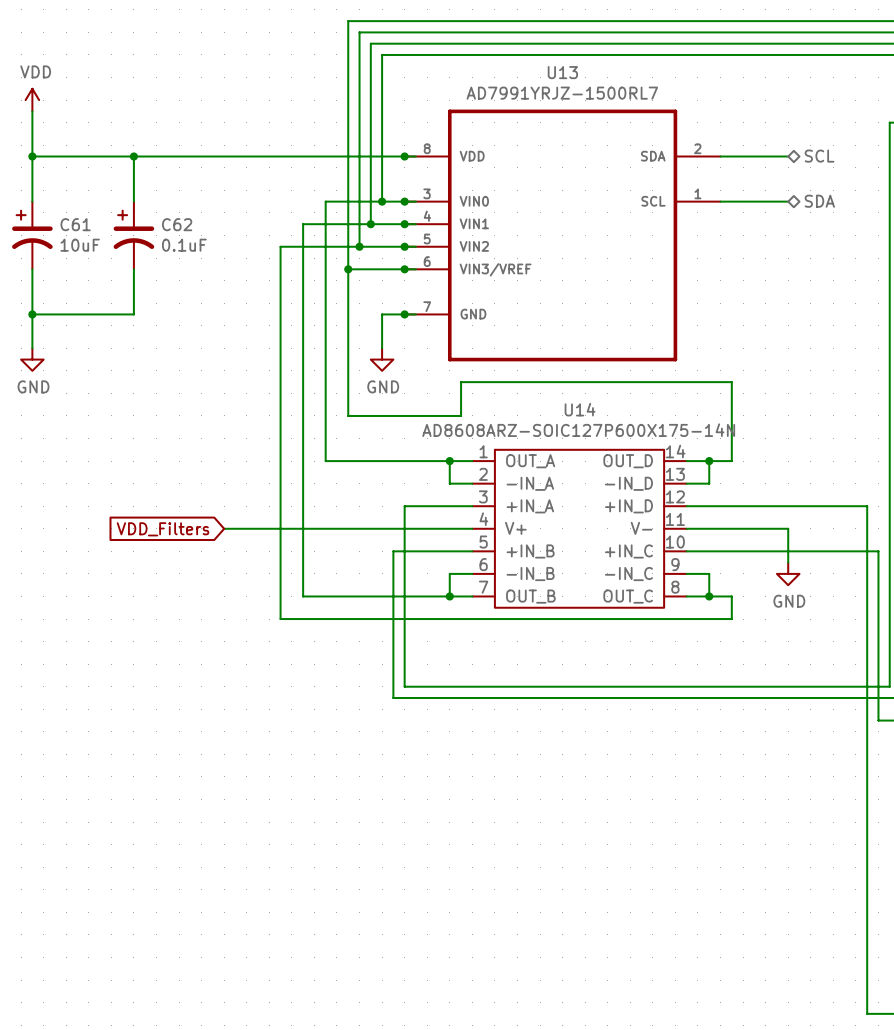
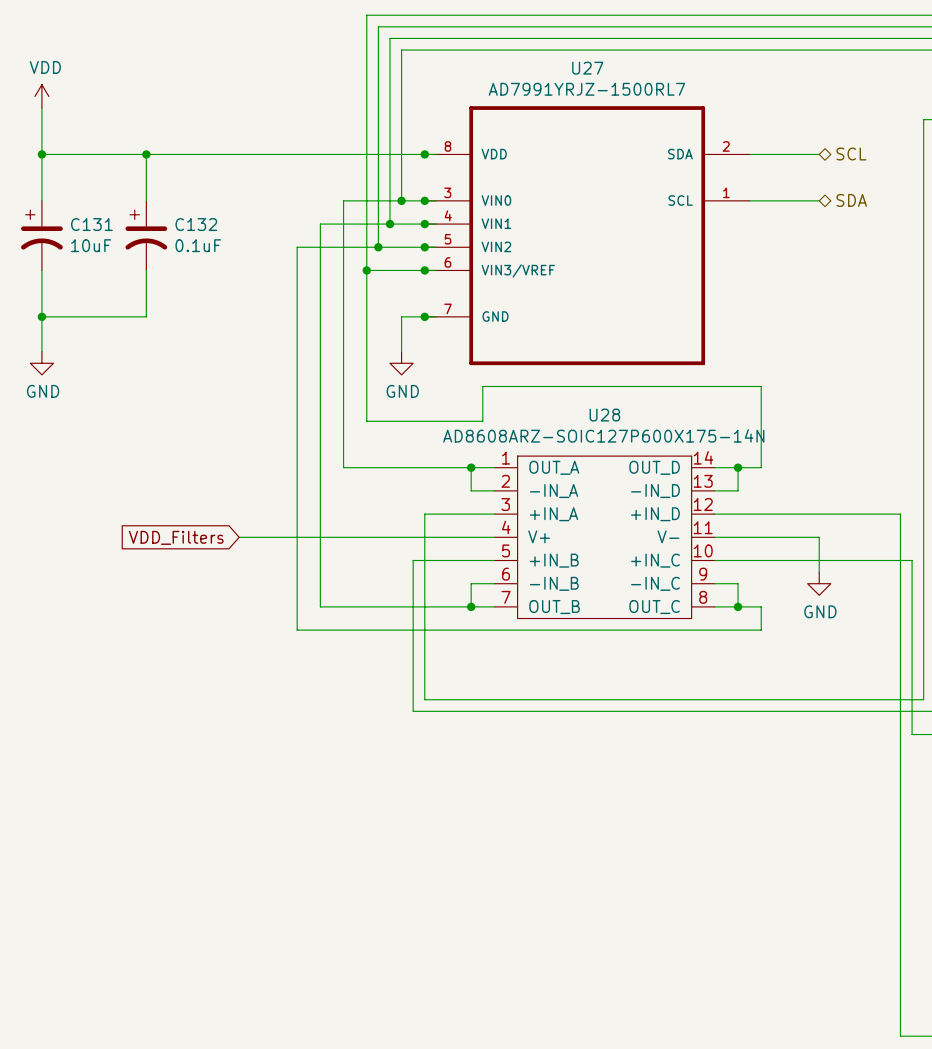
U13 name: U13 (562, 72) -> U27 (587, 68)
C61 name: C61 (75, 224) -> C131 (91, 224)
C62 name: C62 (177, 224) -> C132 (196, 224)
U14 name: U14 (580, 409) -> U28 (604, 415)

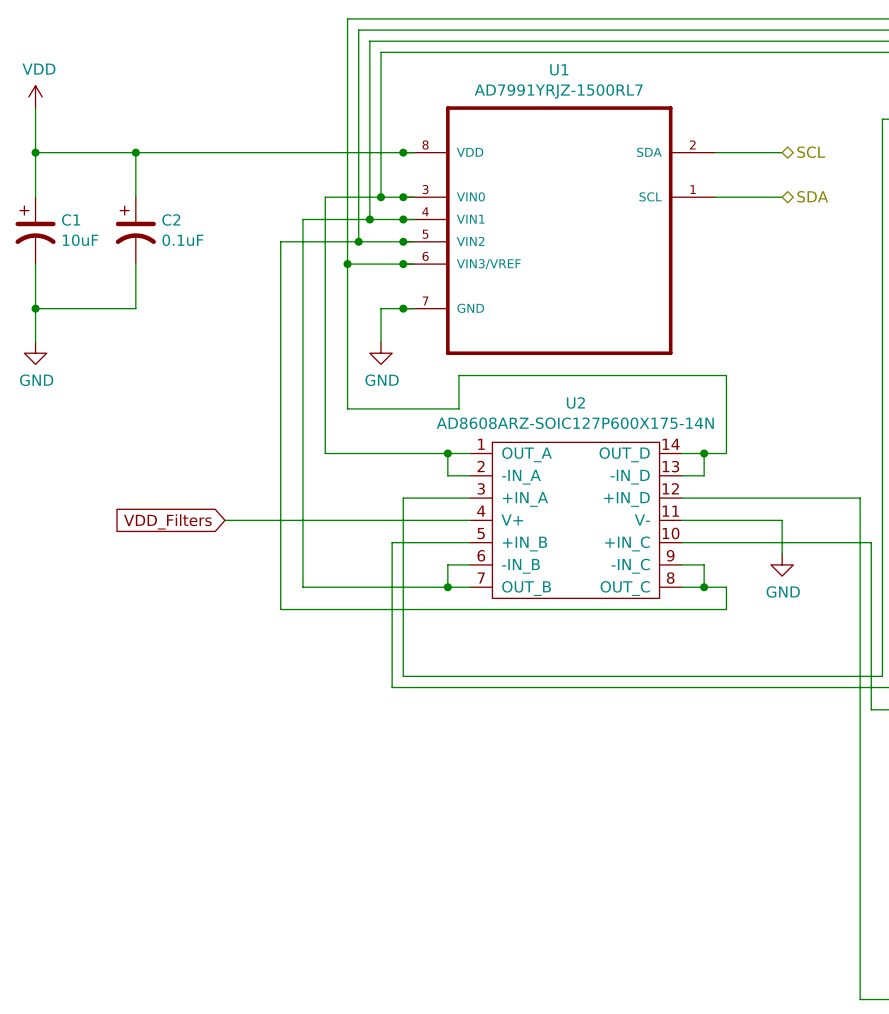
U27 name: U27 (587, 68) -> U1 (559, 69)
C131 name: C131 (91, 224) -> C1 (71, 219)
C132 name: C132 (196, 224) -> C2 (171, 219)
U28 name: U28 (604, 415) -> U2 (575, 402)

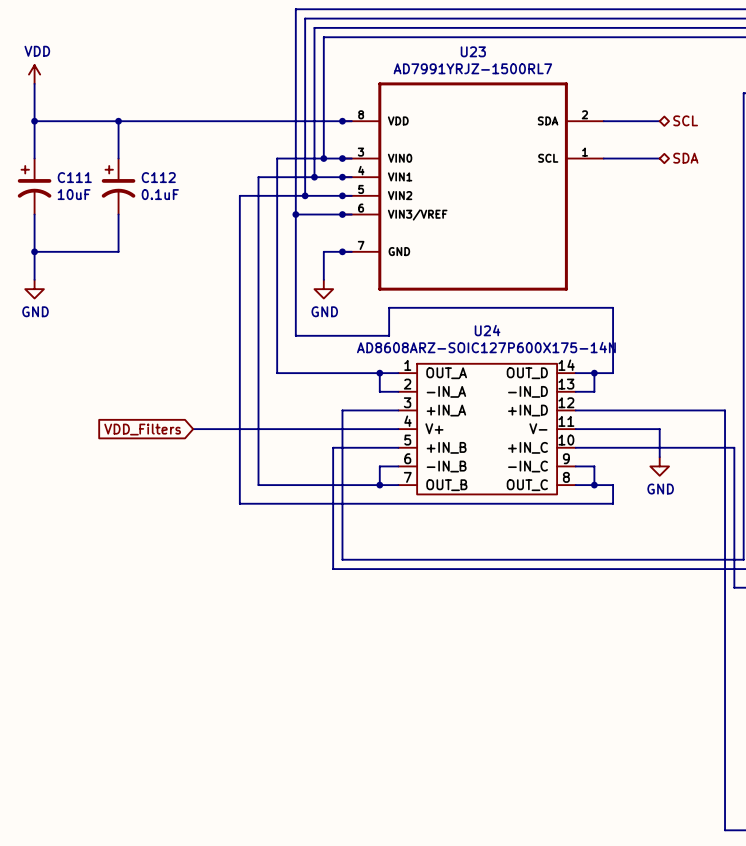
U1 name: U1 (559, 69) -> U23 (473, 51)
C1 name: C1 (71, 219) -> C111 (74, 177)
C2 name: C2 (171, 219) -> C112 (158, 177)
U2 name: U2 (575, 402) -> U24 (487, 330)

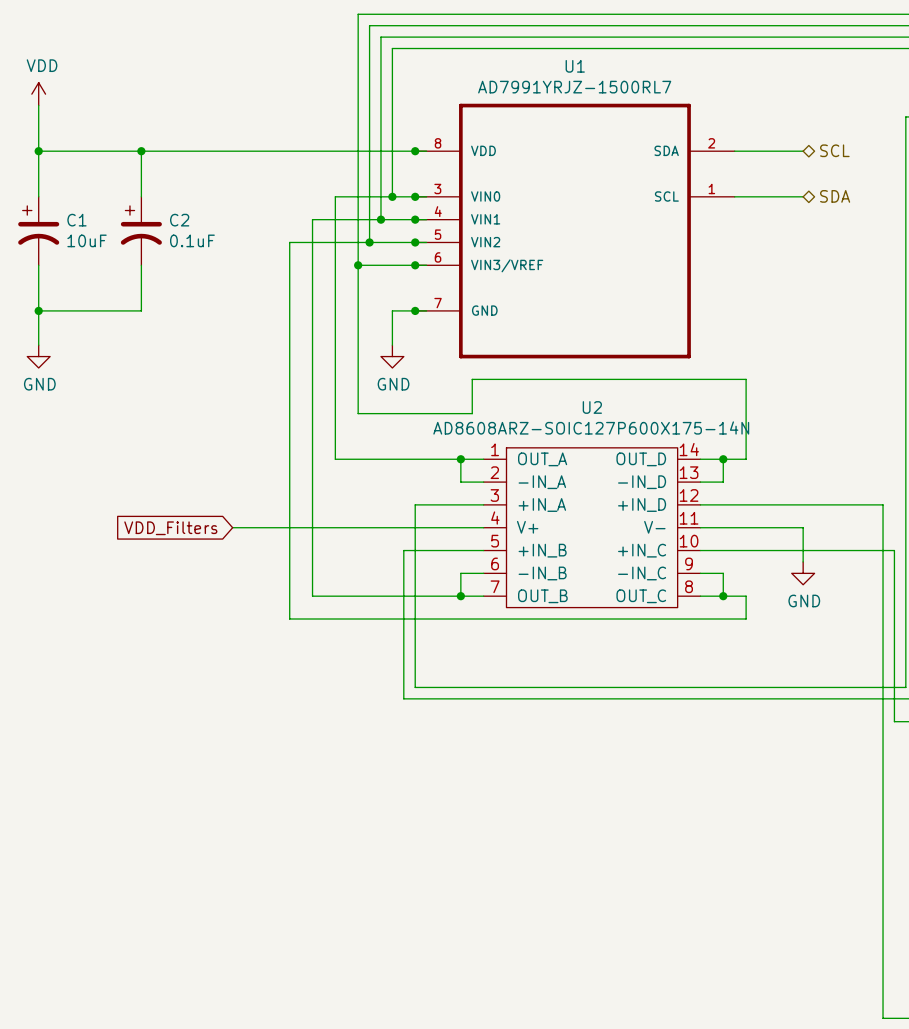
U23 name: U23 (473, 51) -> U1 (575, 66)
C111 name: C111 (74, 177) -> C1 (76, 220)
C112 name: C112 (158, 177) -> C2 (179, 220)
U24 name: U24 (487, 330) -> U2 (592, 407)

